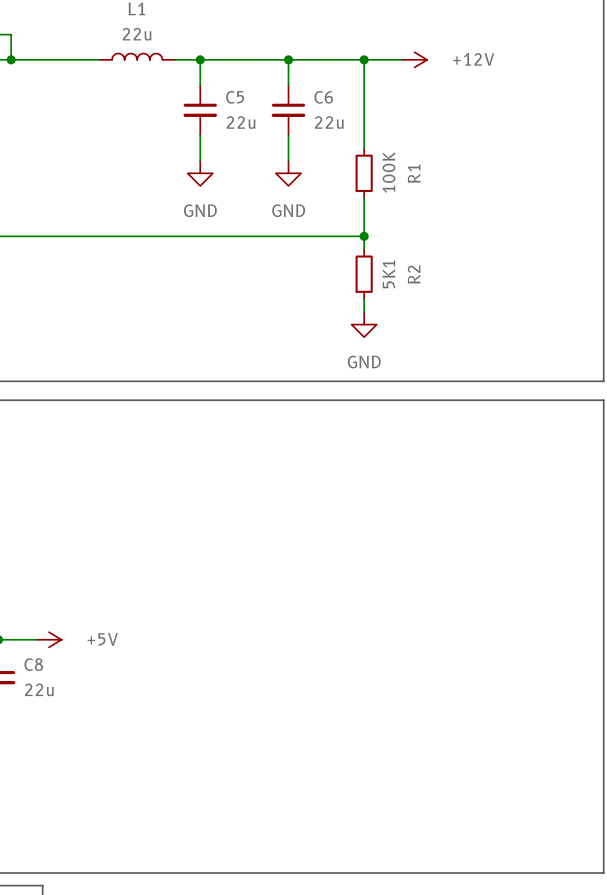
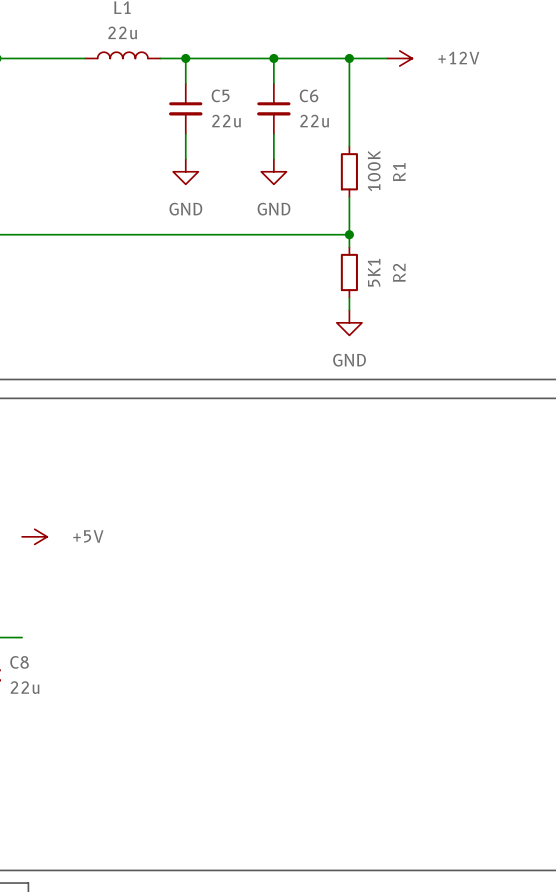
power symbol position: +5V (48, 639) -> +5V (34, 536)

